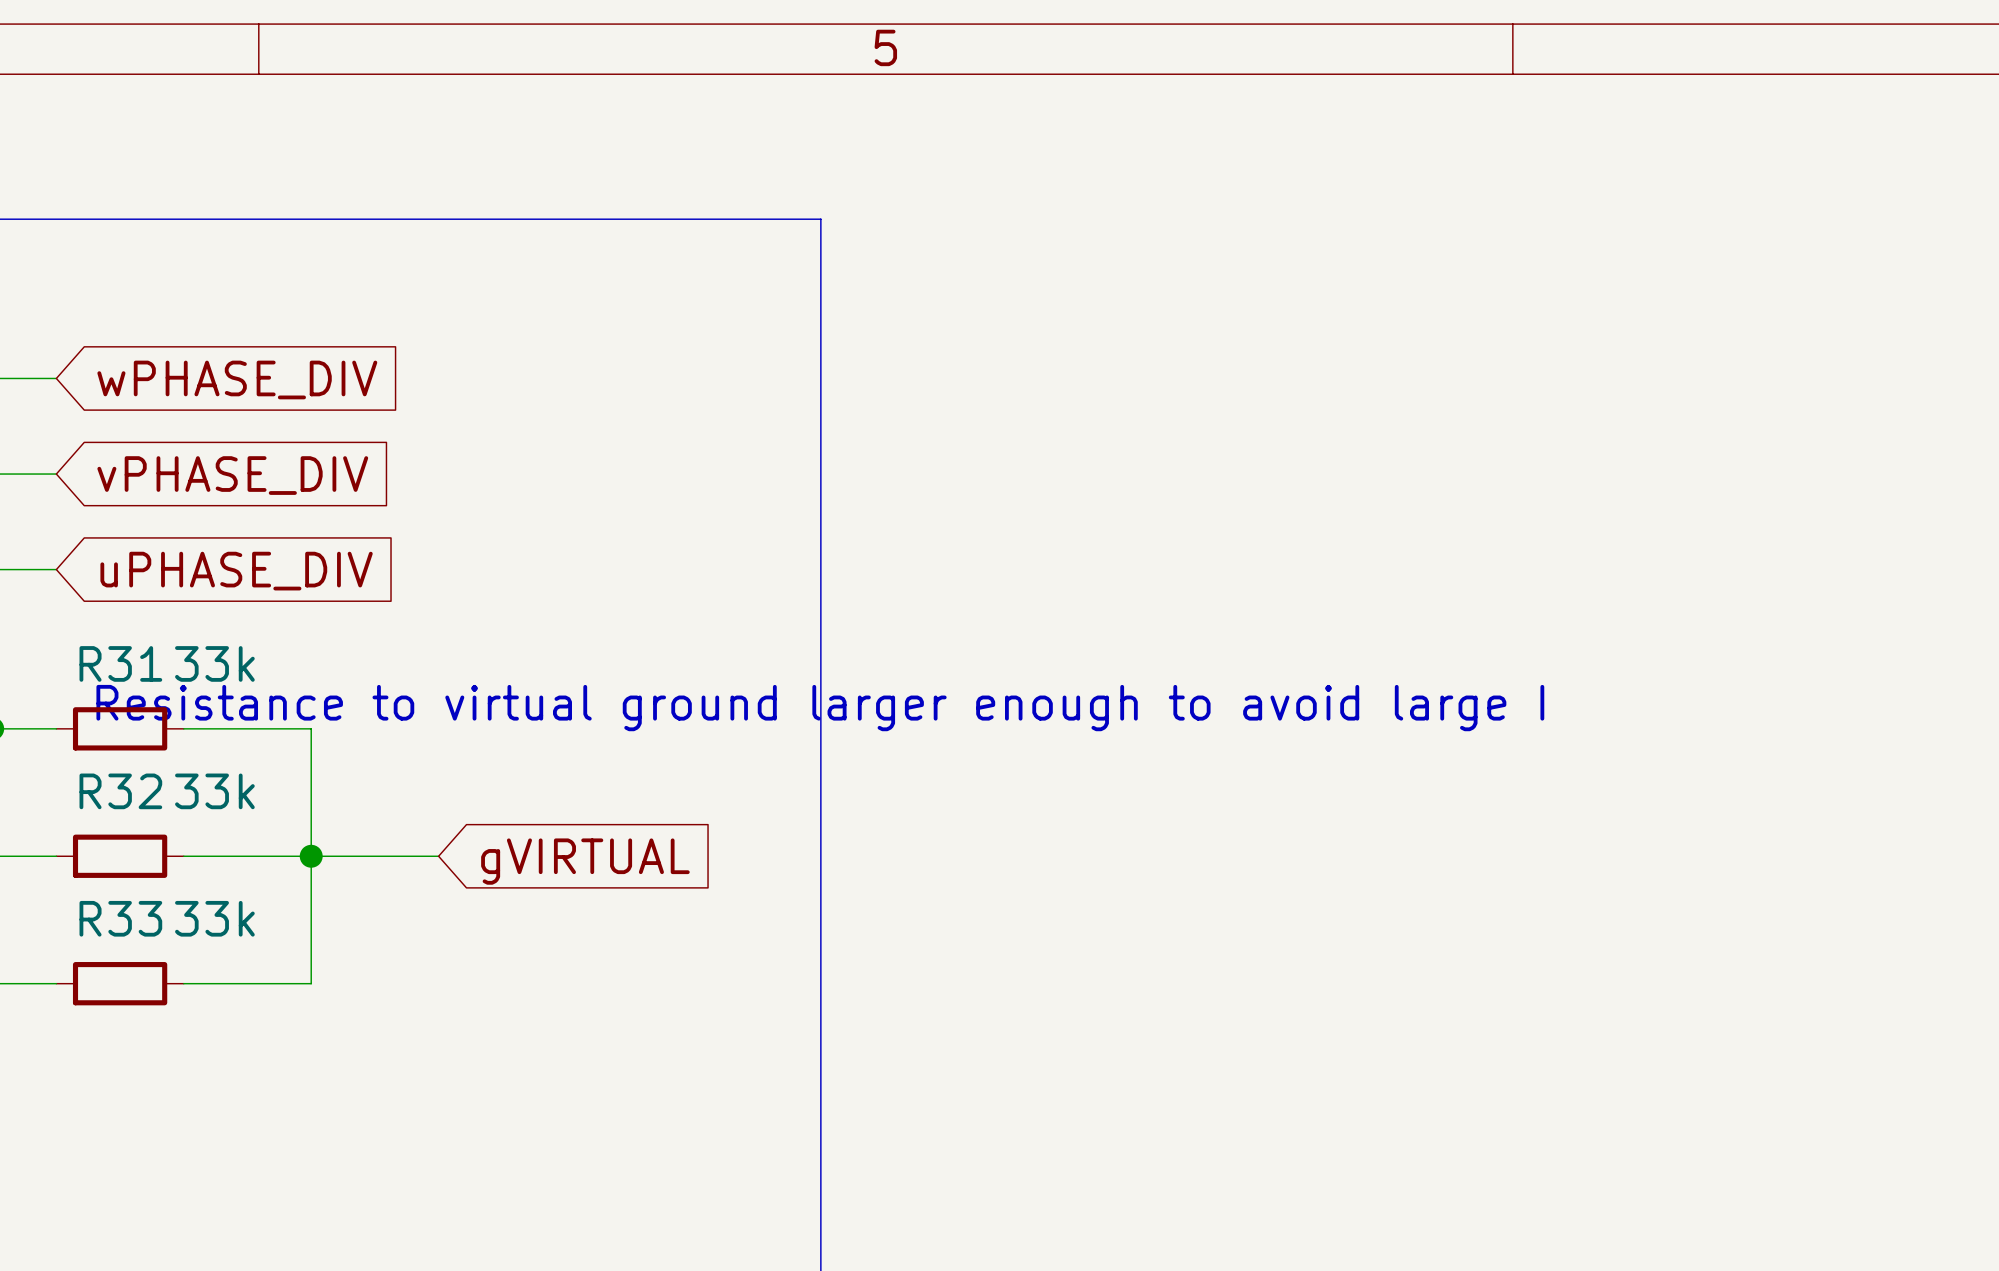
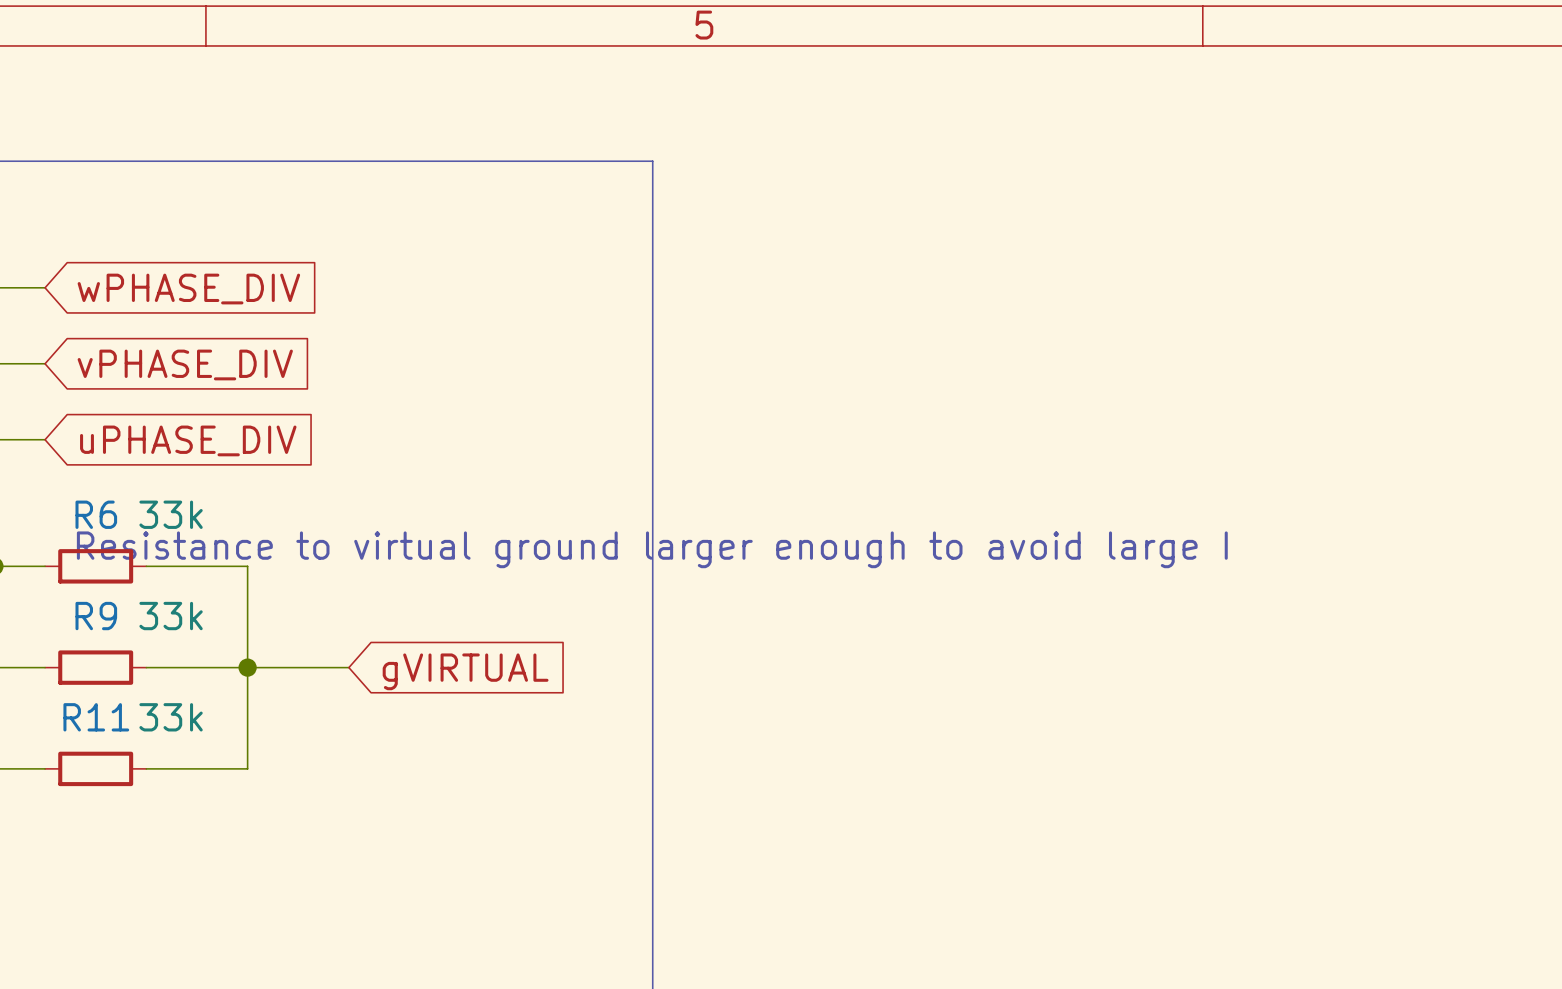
R31 name: R31 (120, 663) -> R6 (96, 514)
R32 name: R32 (120, 791) -> R9 (96, 616)
R33 name: R33 (120, 918) -> R11 (96, 717)

